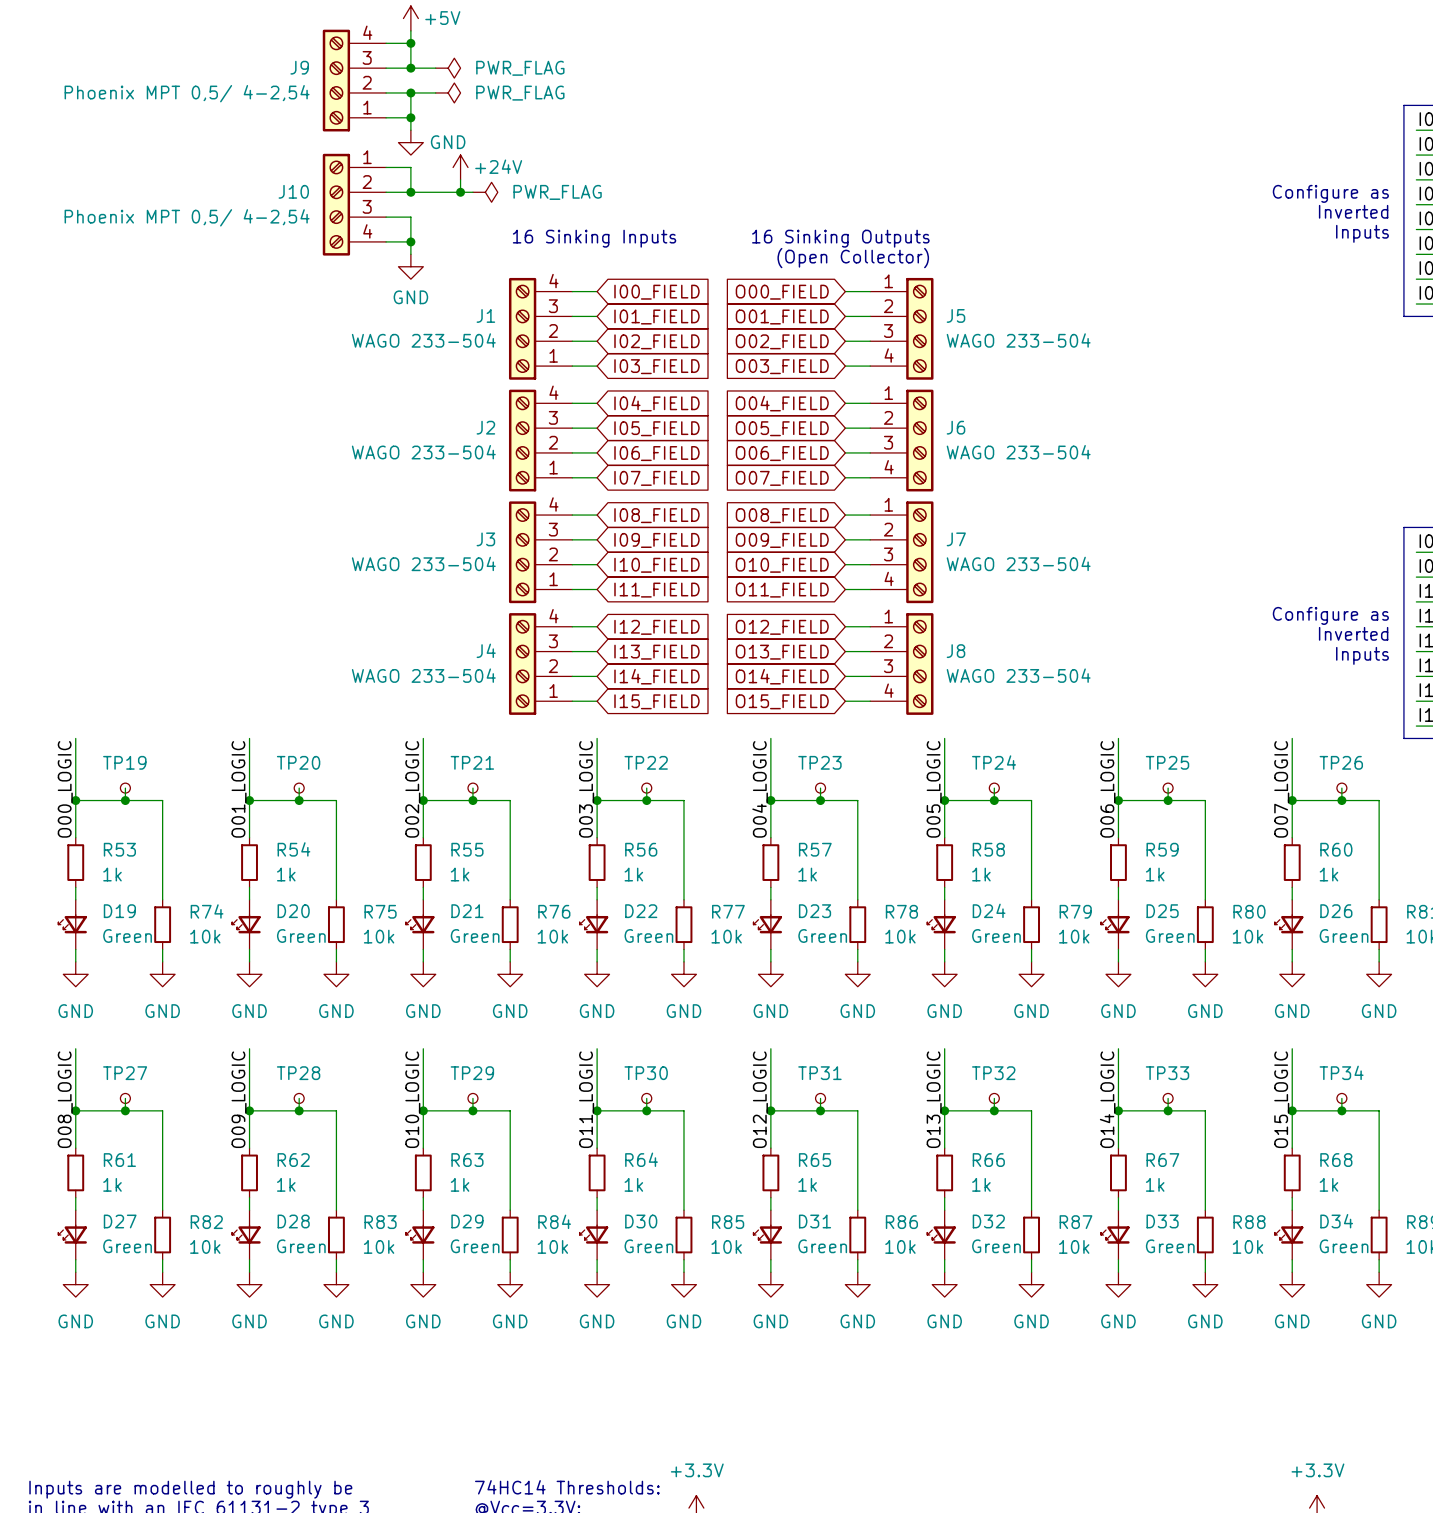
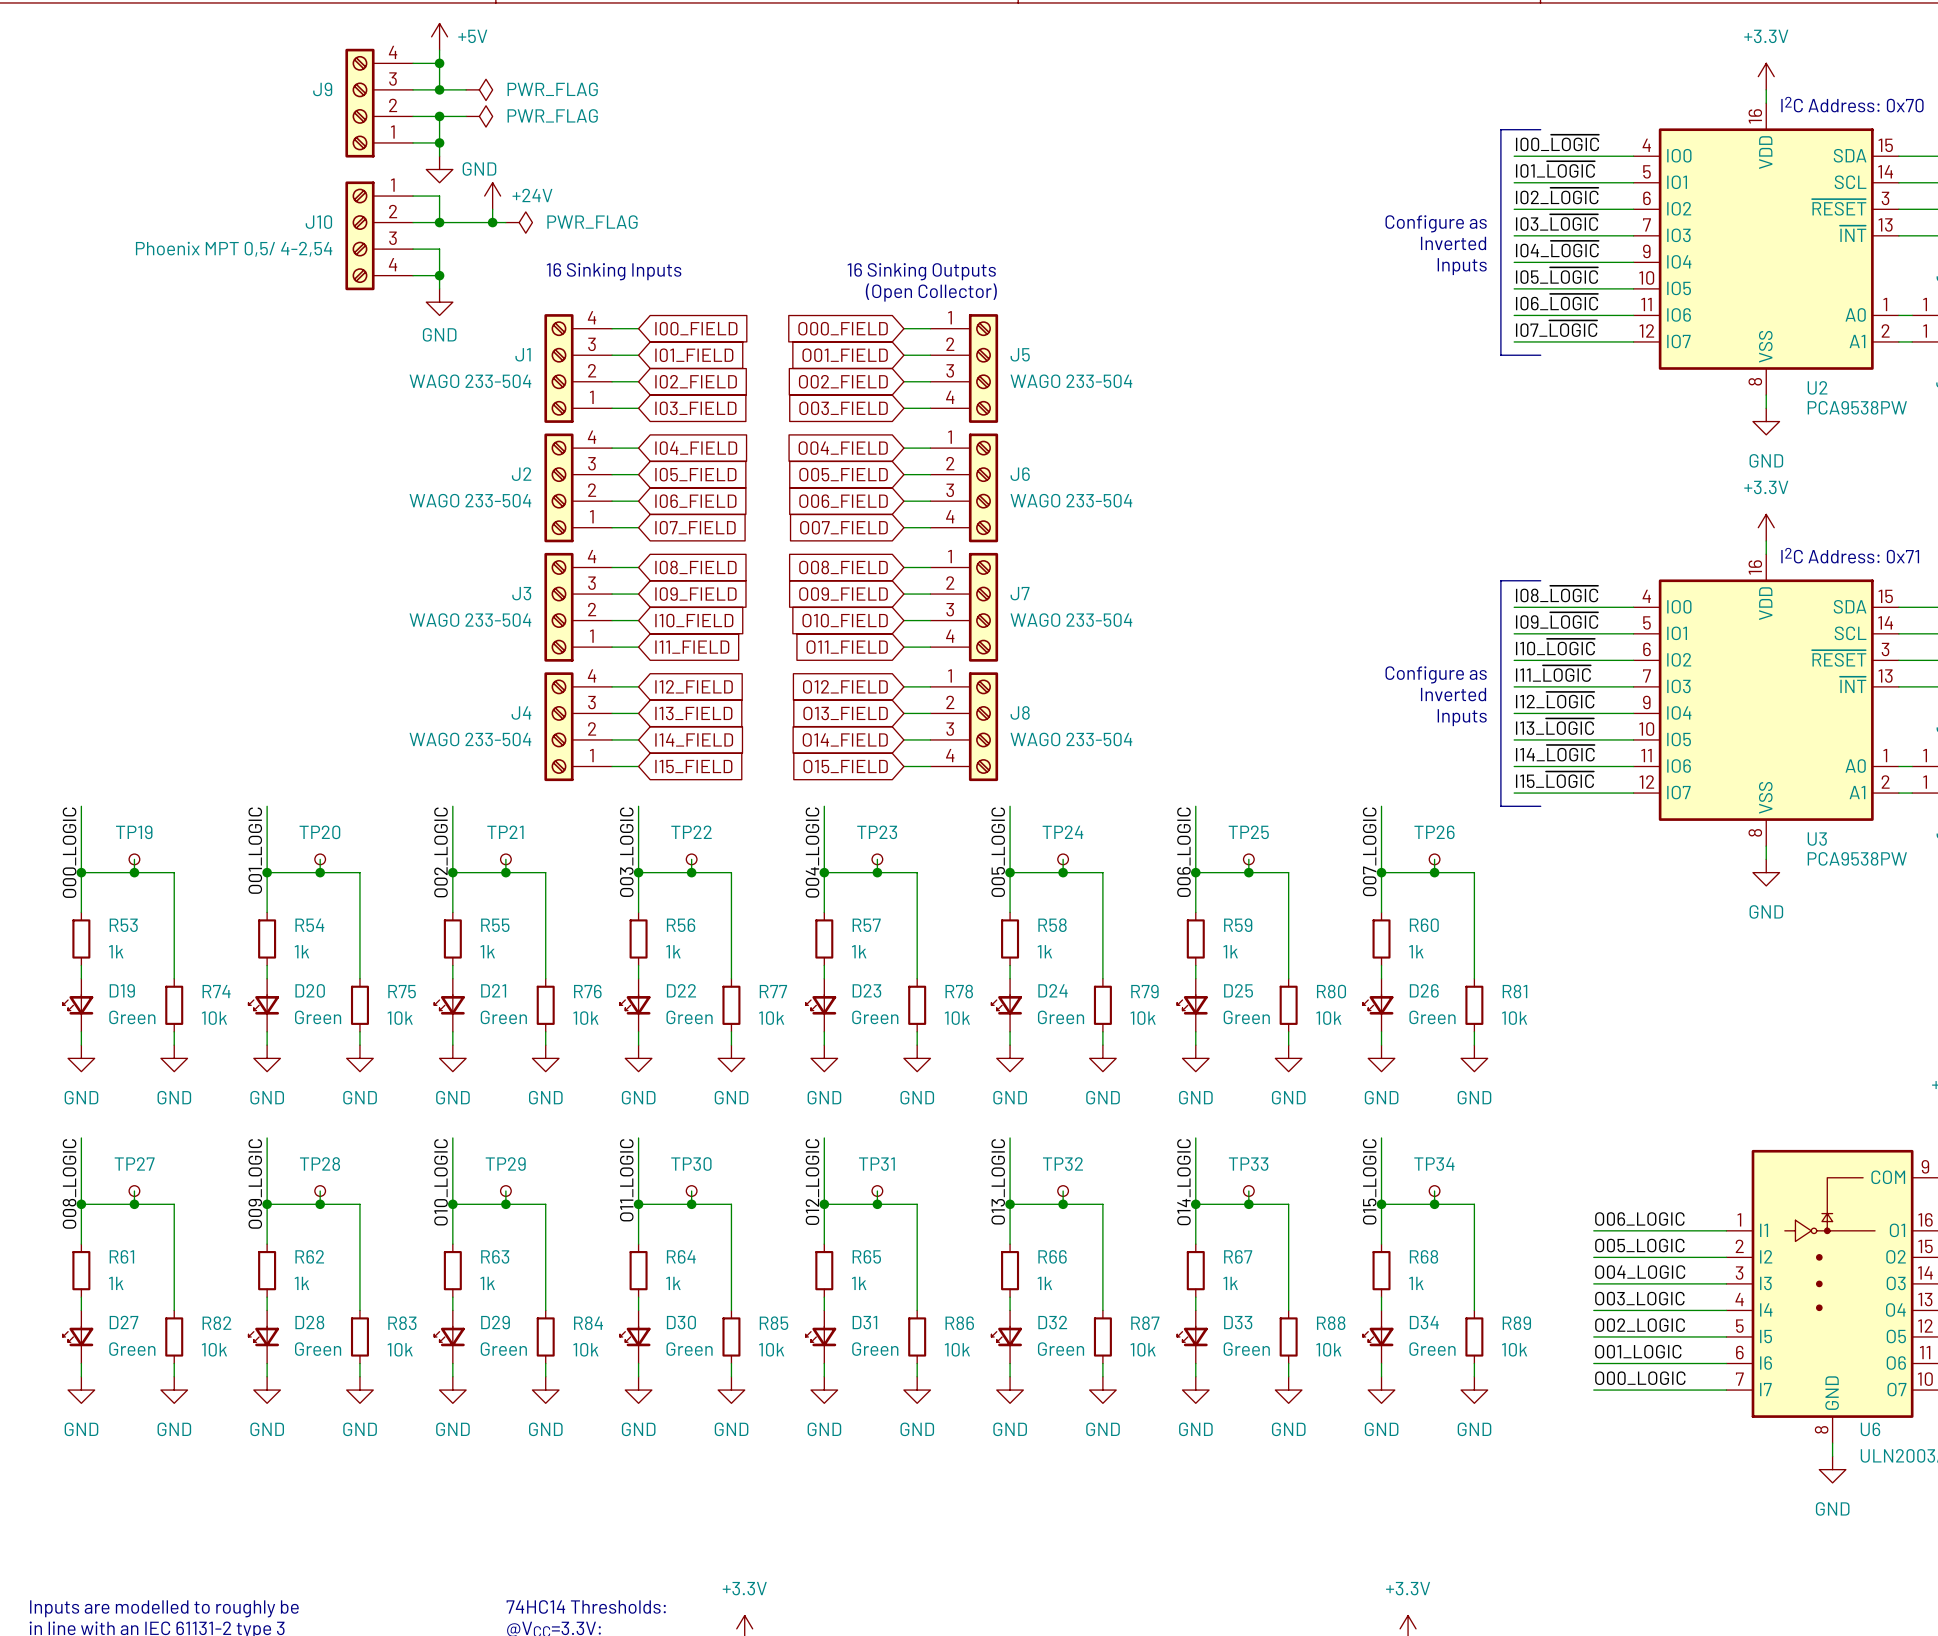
J9 value: Phoenix MPT 0,5/ 4-2,54 (187, 93) -> none

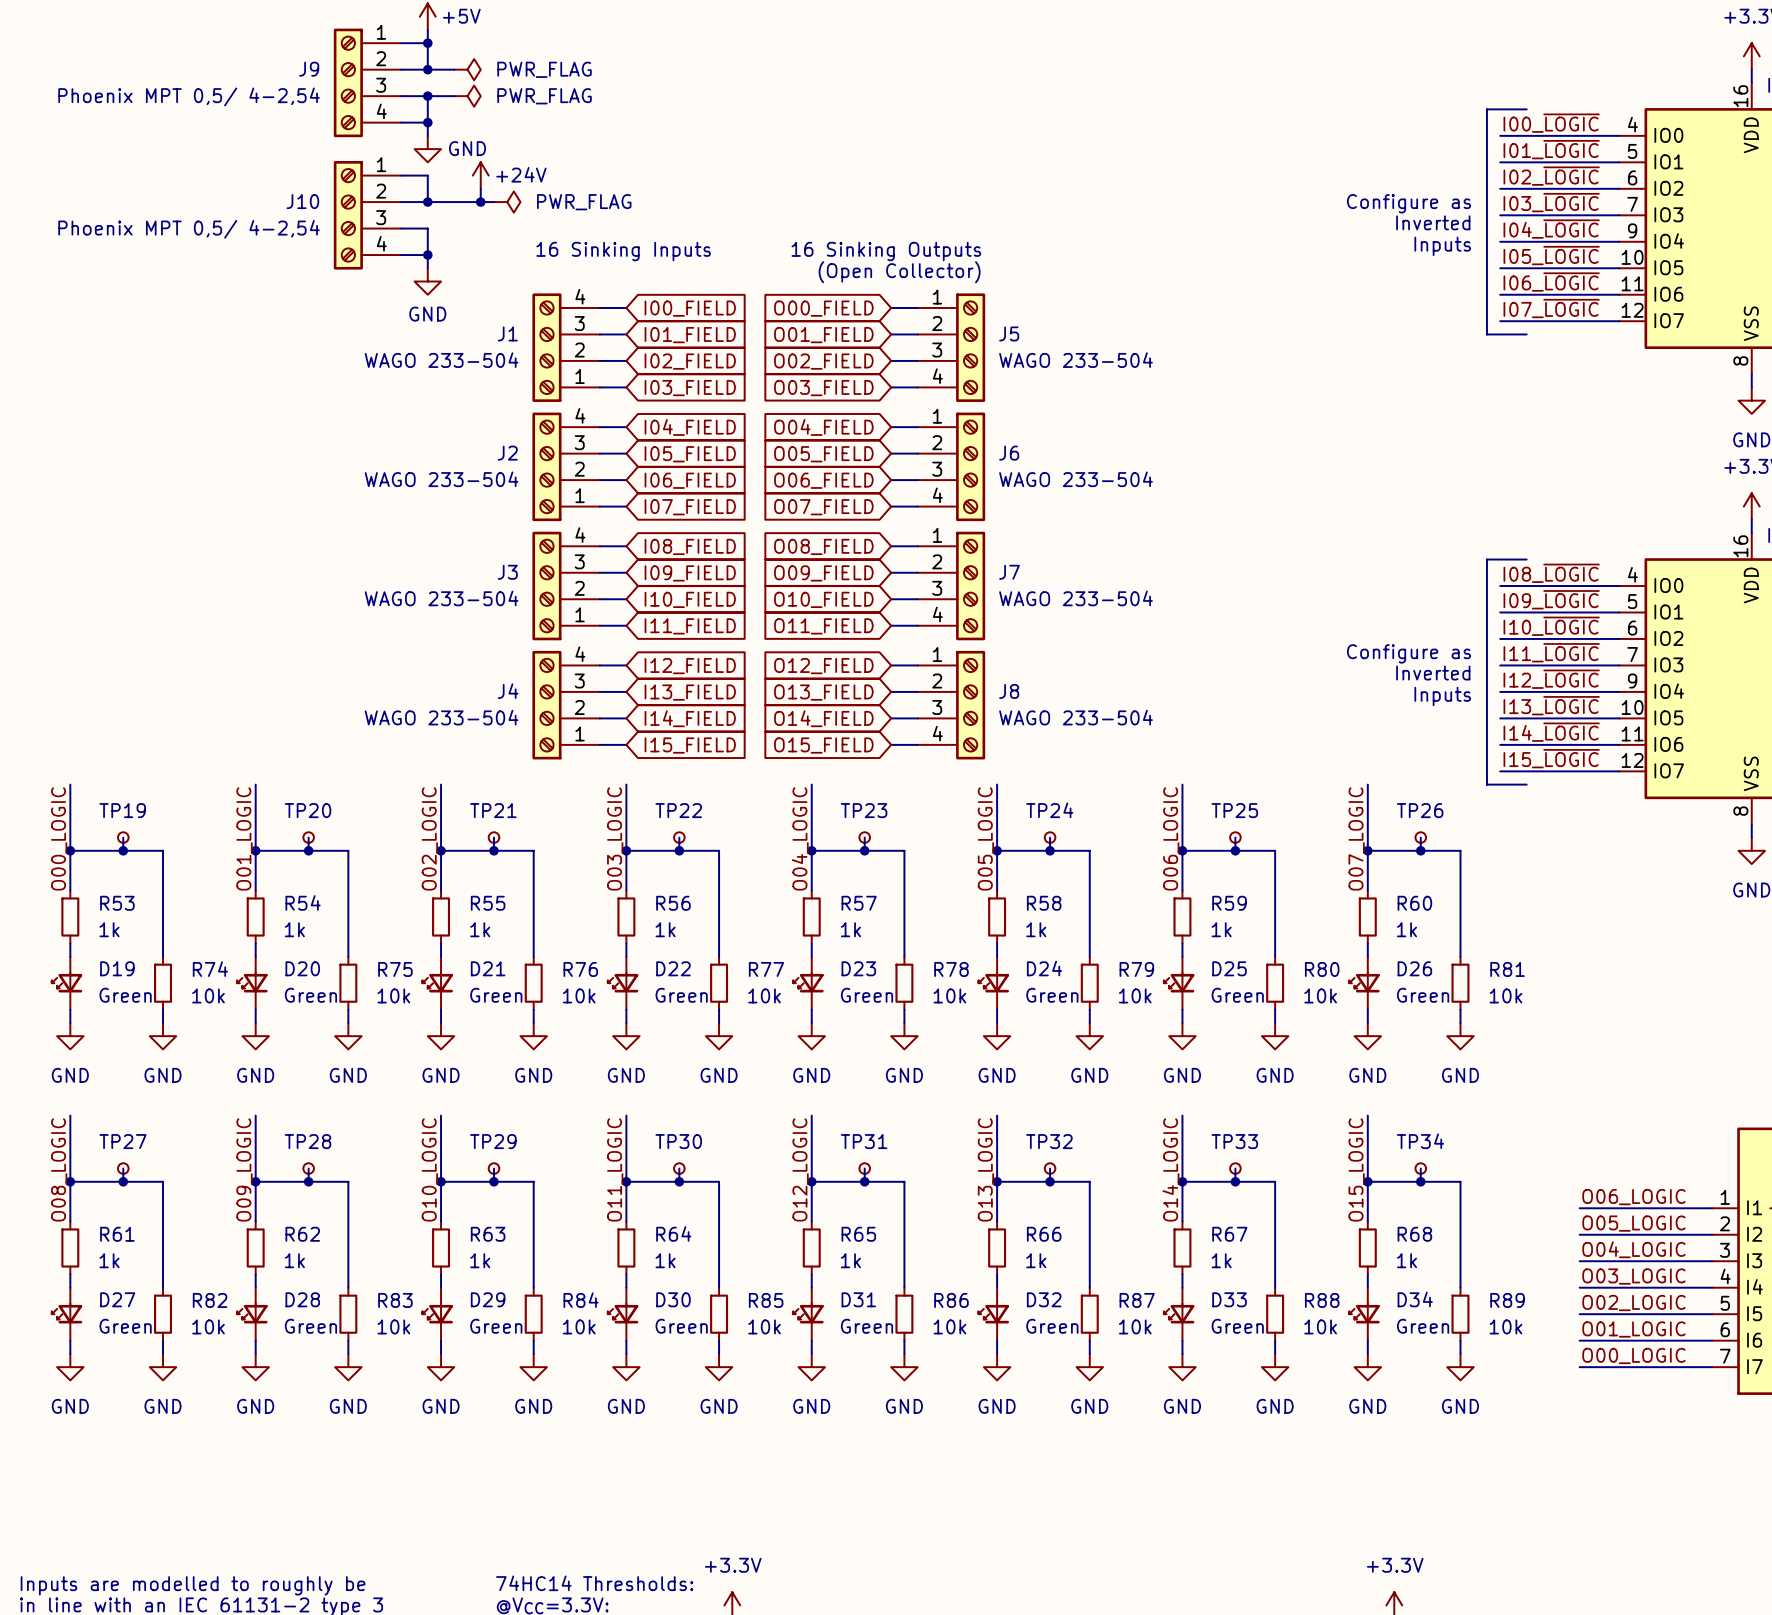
J9 flip: as is (359, 103) -> up-down (348, 82)
J9 value: none -> Phoenix MPT 0,5/ 4-2,54 (189, 96)

